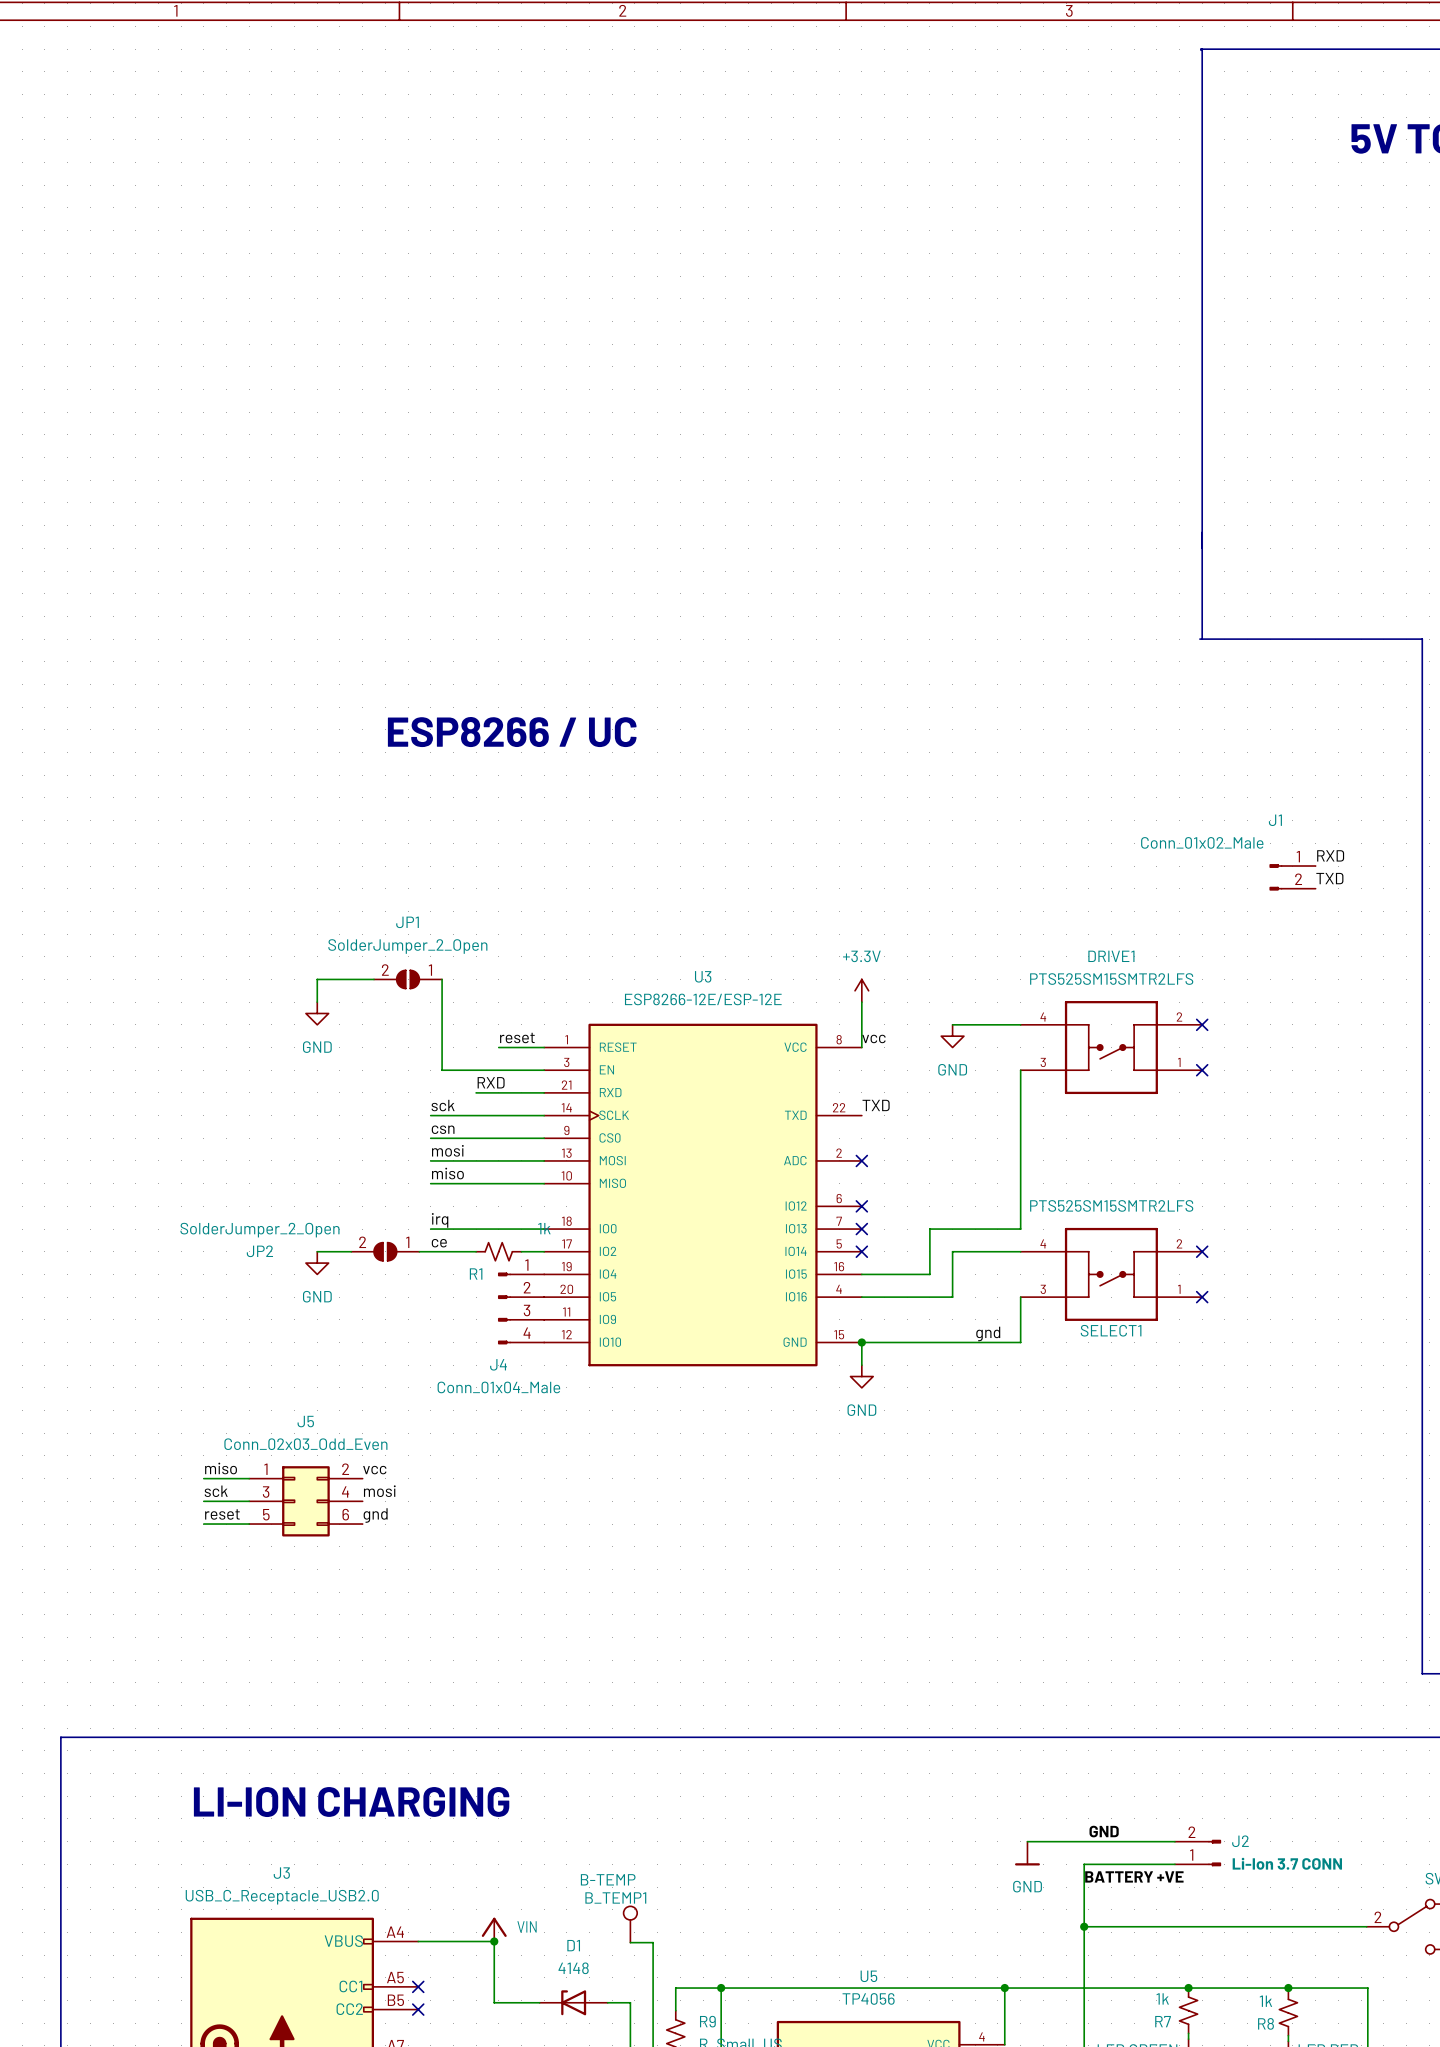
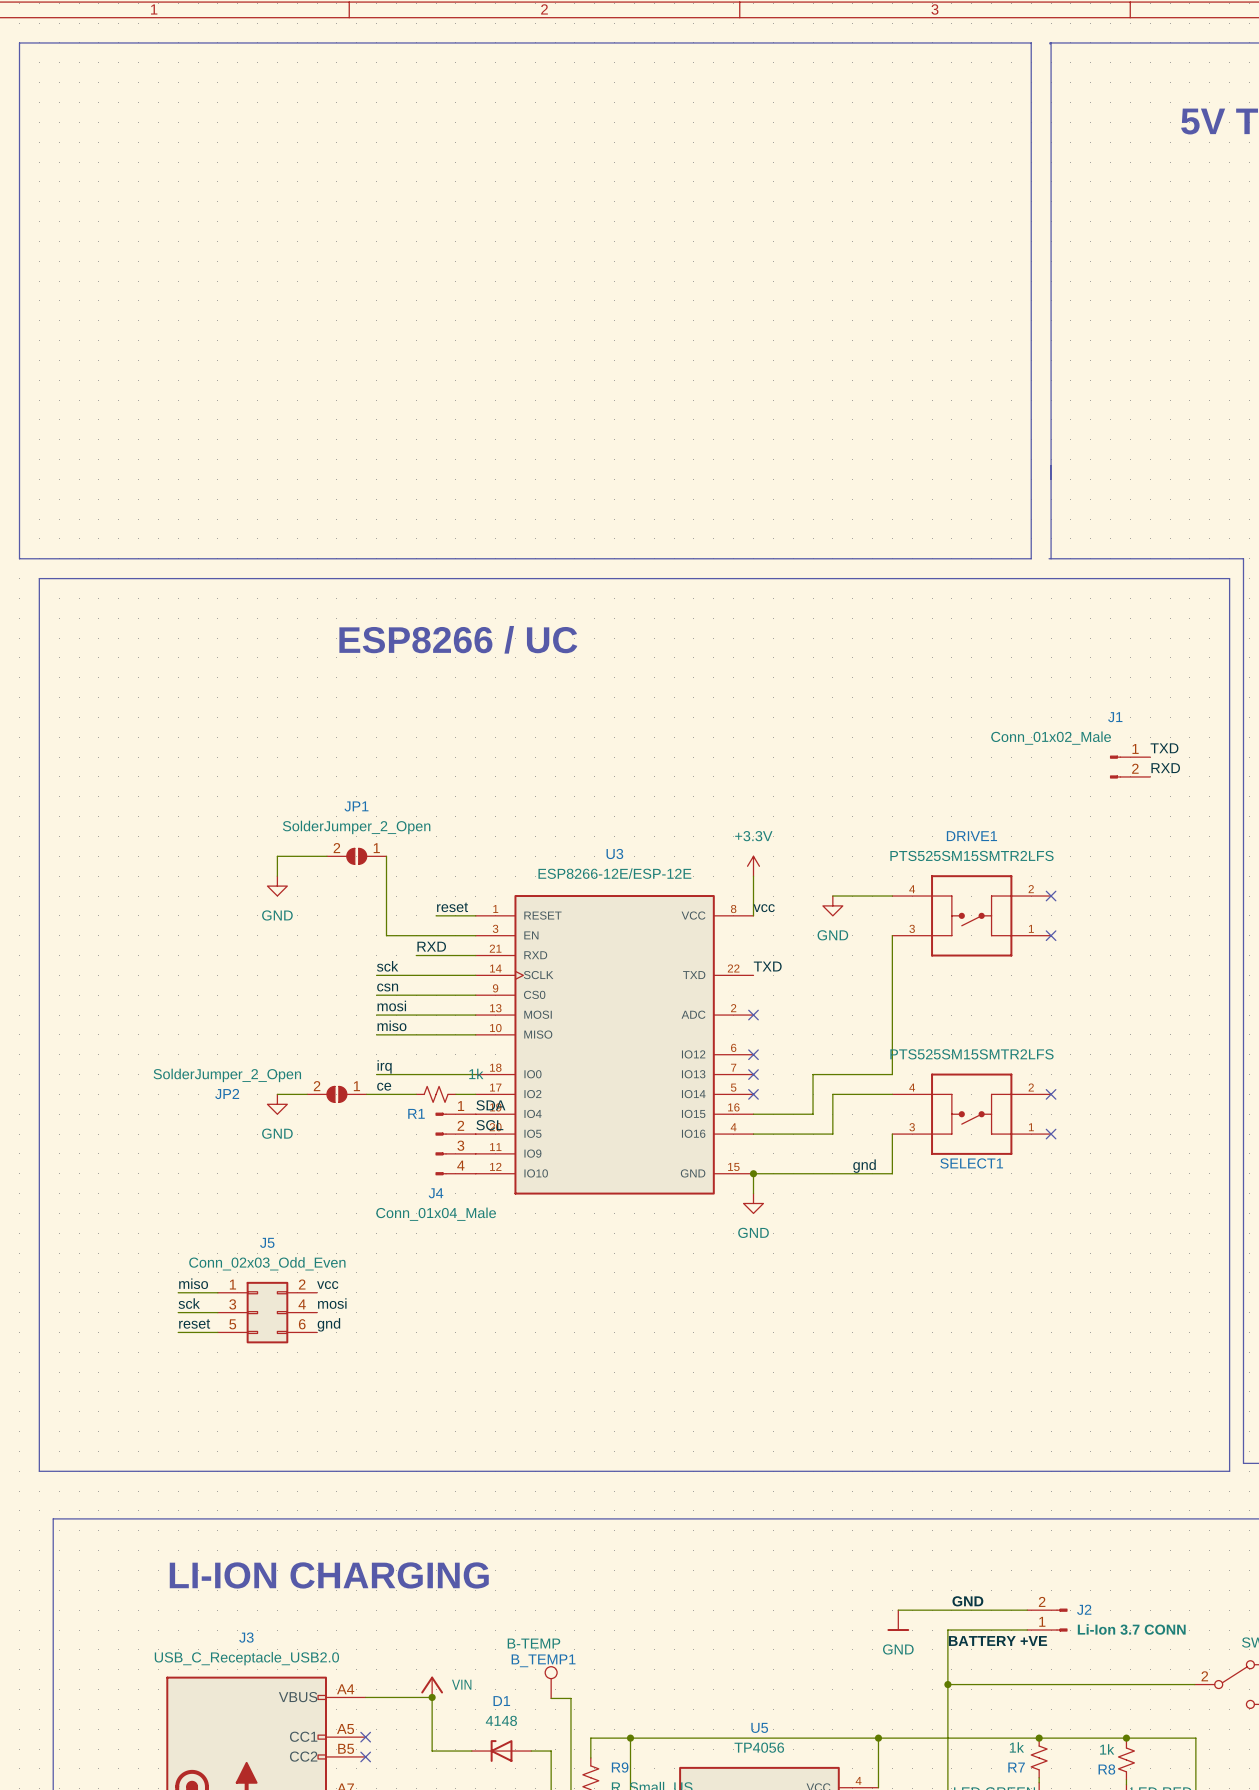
line: none -> (19, 42) (19, 558) (1031, 558) (1031, 42) (19, 42)
line: none -> (39, 578) (1229, 578) (1229, 1471) (39, 1471) (39, 578)
label: RXD (1330, 855) -> TXD (1164, 748)
label: TXD (1329, 878) -> RXD (1165, 768)
label: none -> SDA (490, 1105)
label: none -> SCL (489, 1125)

